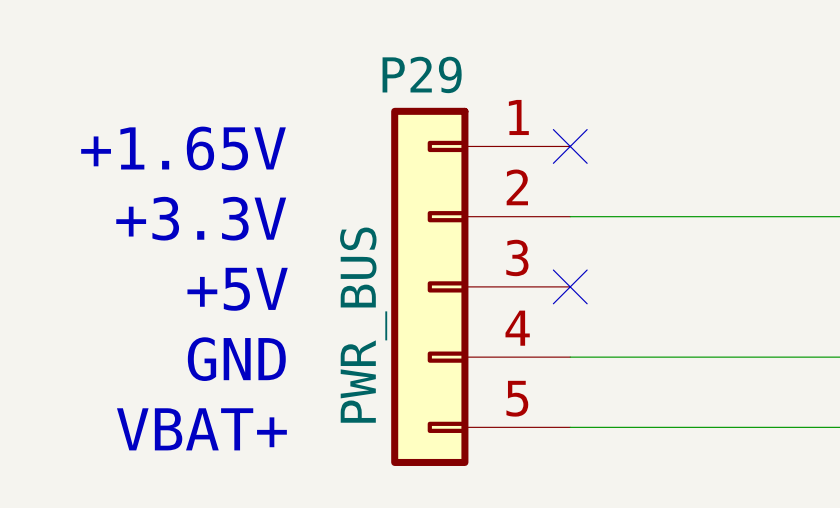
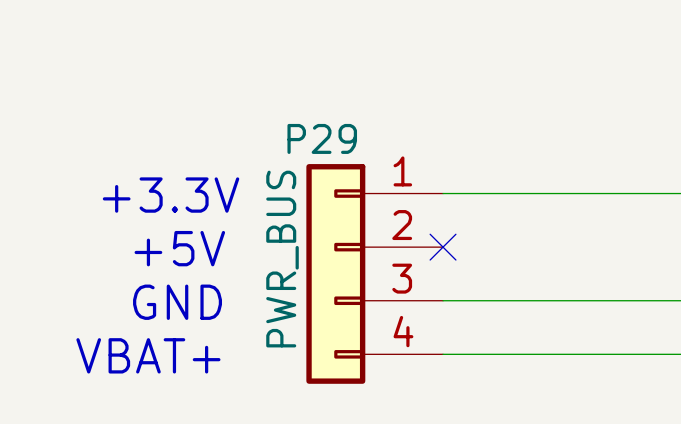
P29 symbol: [391, 107, 571, 466] -> [306, 164, 444, 384]
no-connect mark: (570, 146) -> none
text: +1.65V (183, 148) -> none

